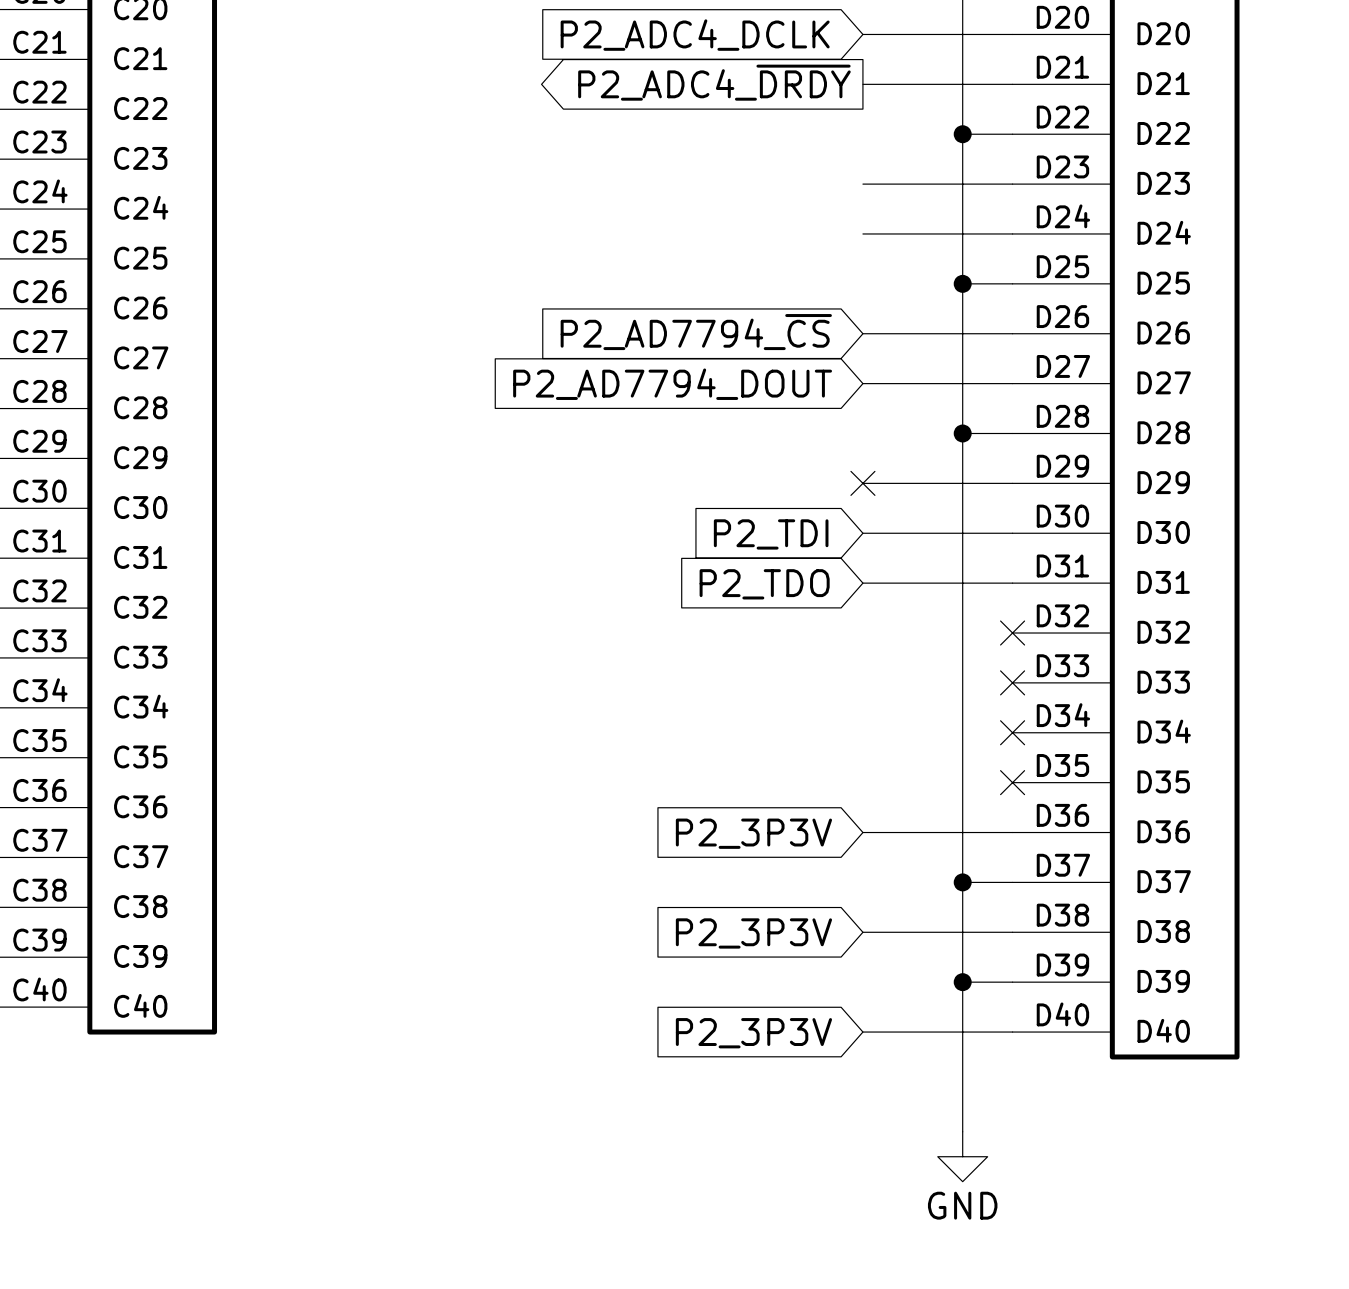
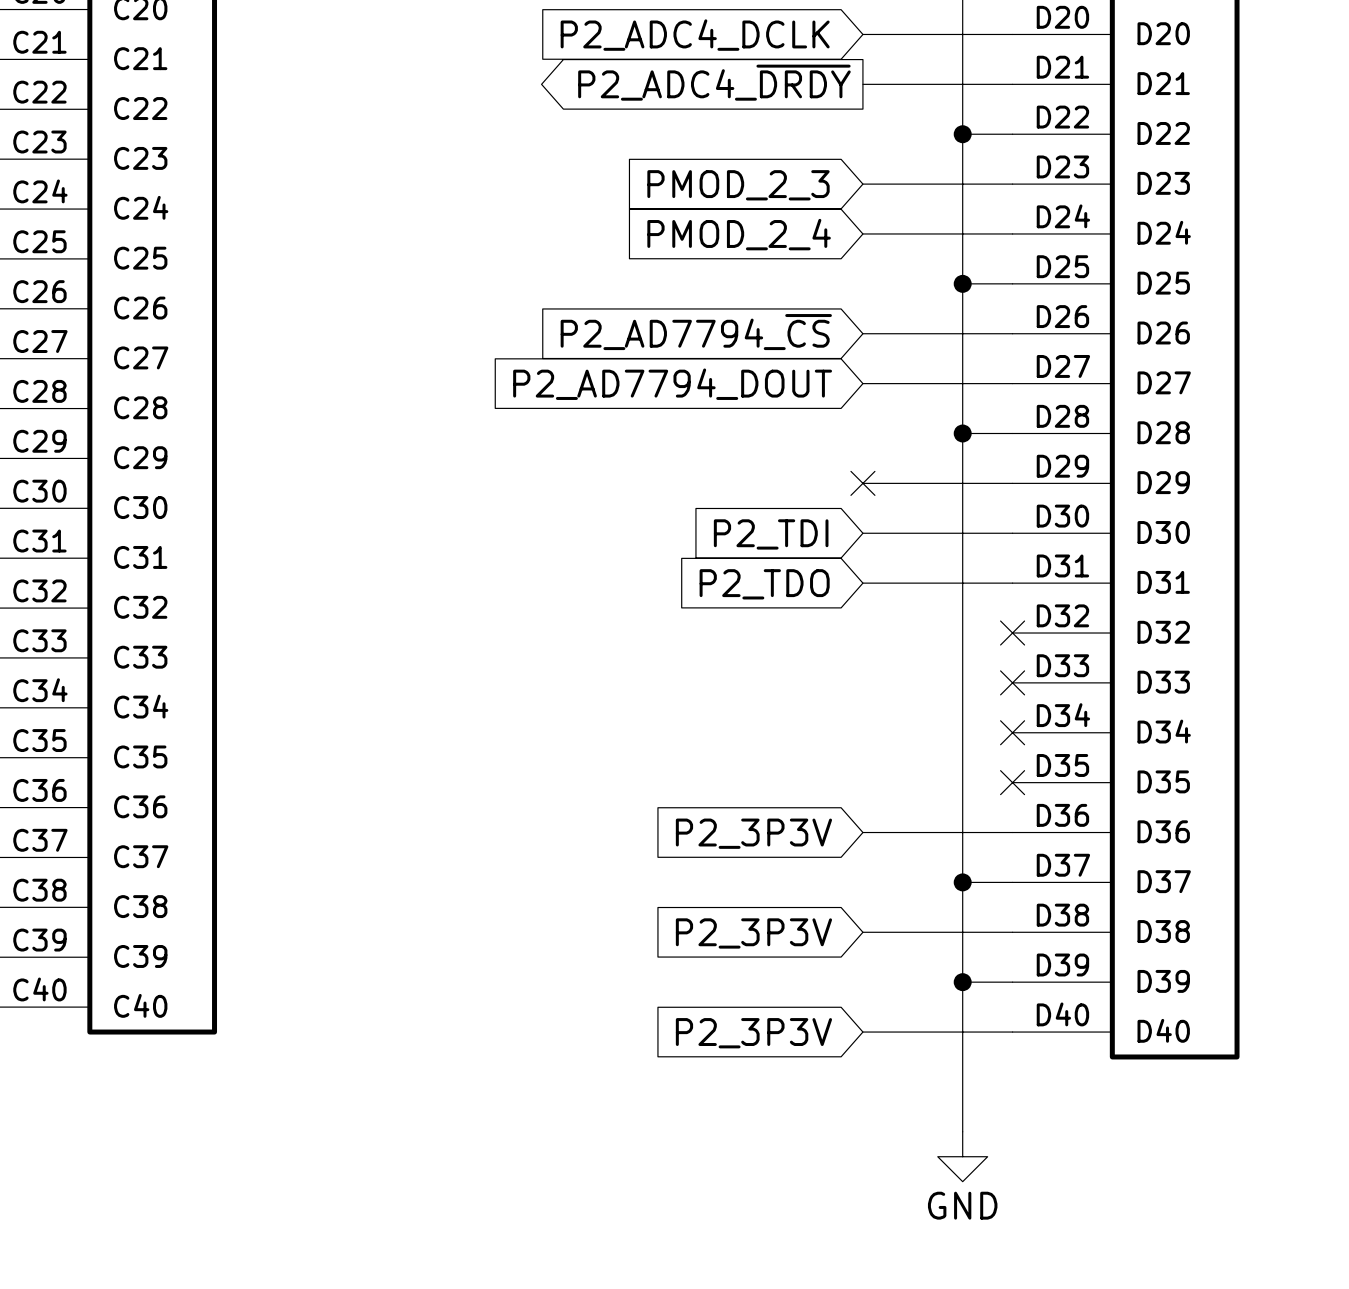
global label: none -> PMOD_2_3 (738, 185)
global label: none -> PMOD_2_4 (739, 234)

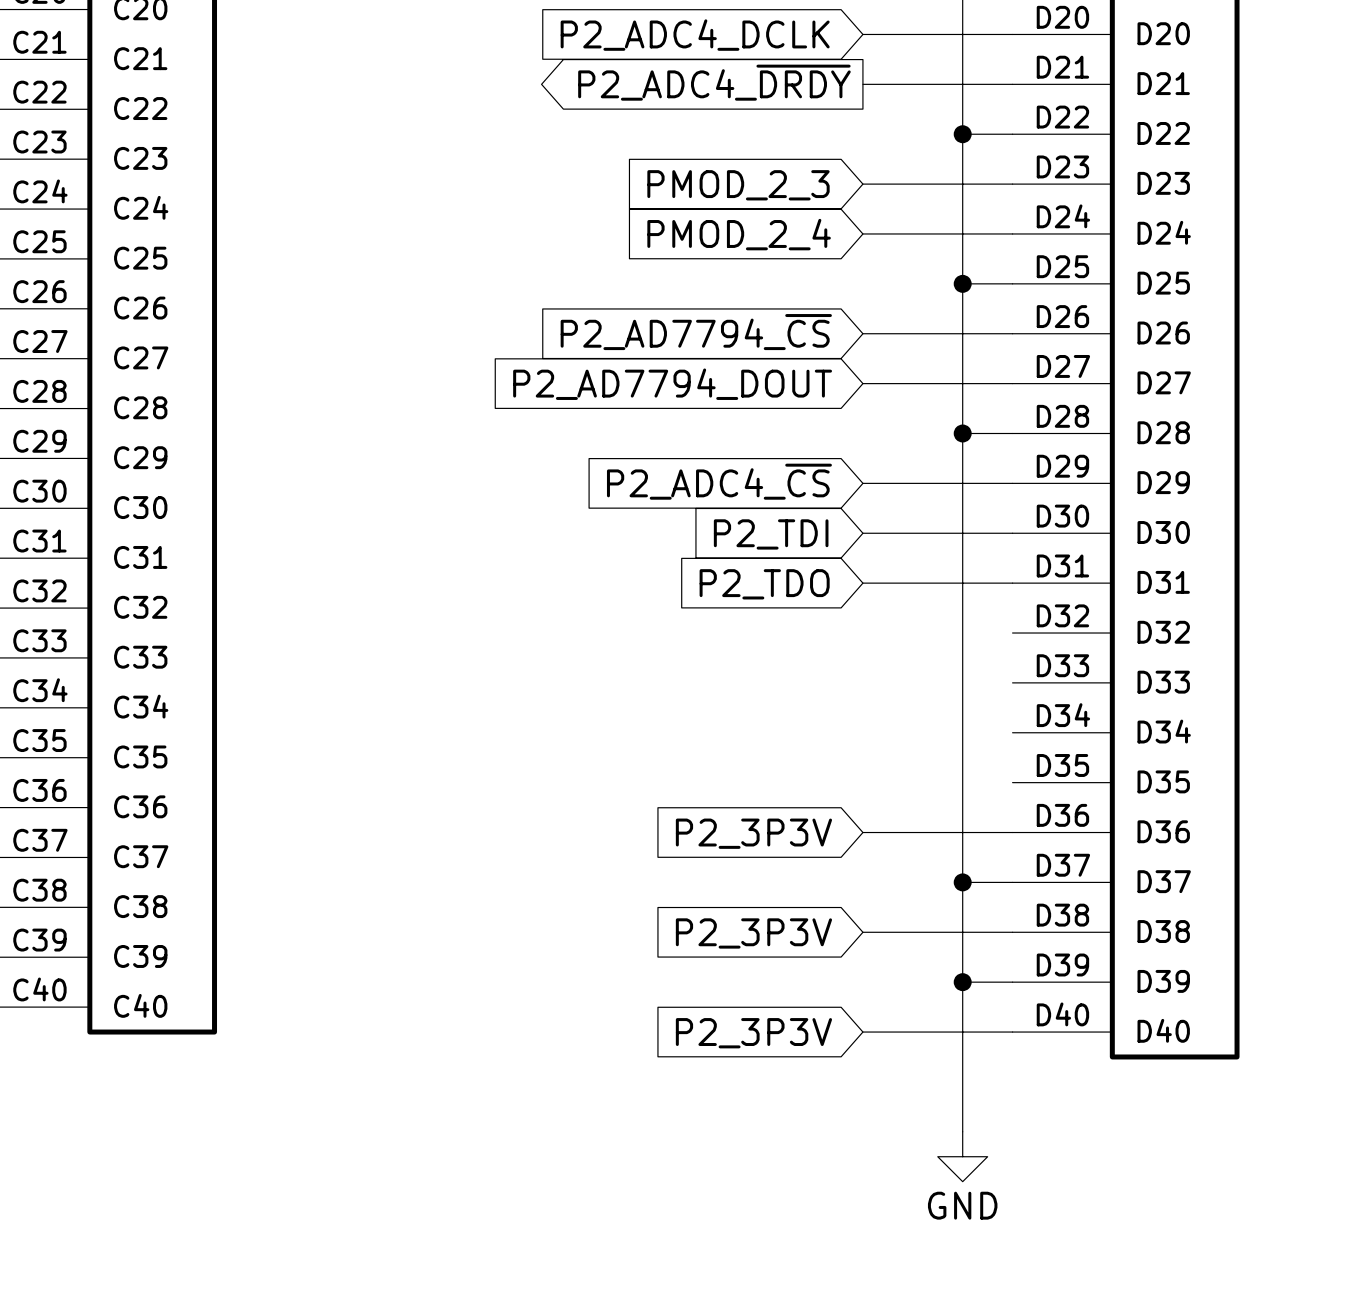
global label: none -> P2_ADC4_~{CS} (719, 481)
no-connect mark: (862, 483) -> none
no-connect mark: (1012, 633) -> none
no-connect mark: (1012, 682) -> none
no-connect mark: (1012, 732) -> none
no-connect mark: (1012, 782) -> none

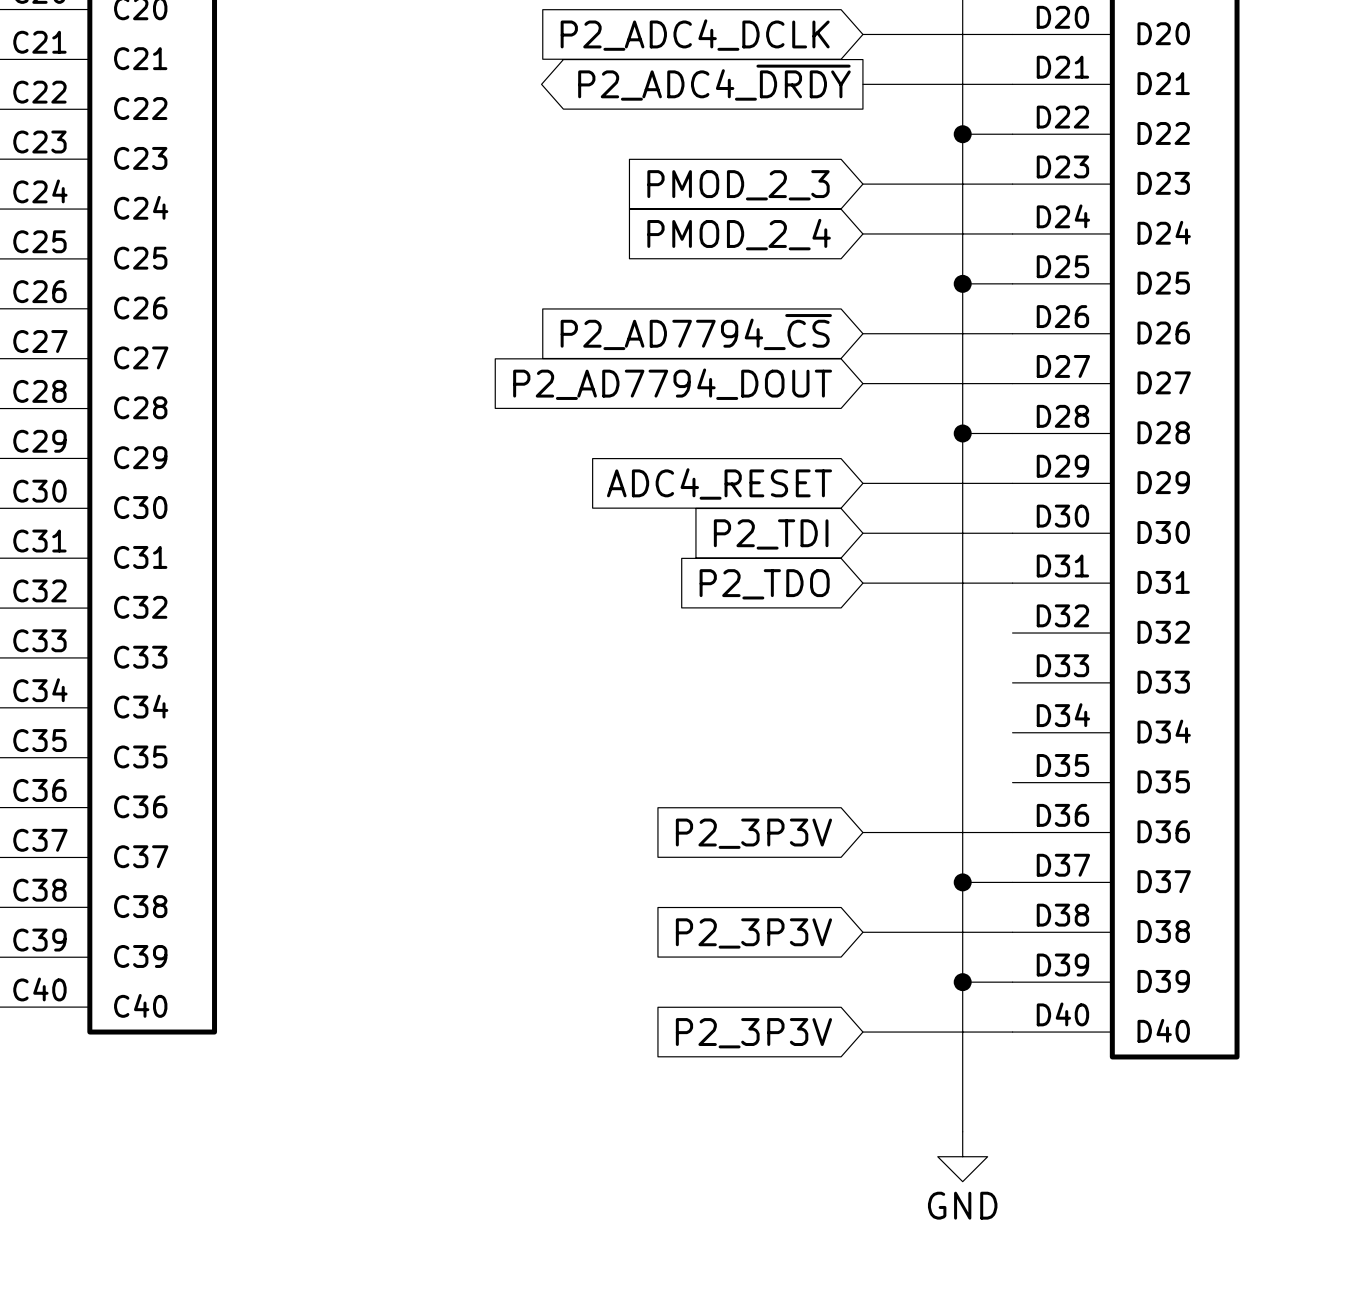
global label: P2_ADC4_~{CS} (719, 481) -> ADC4_RESET (719, 483)

